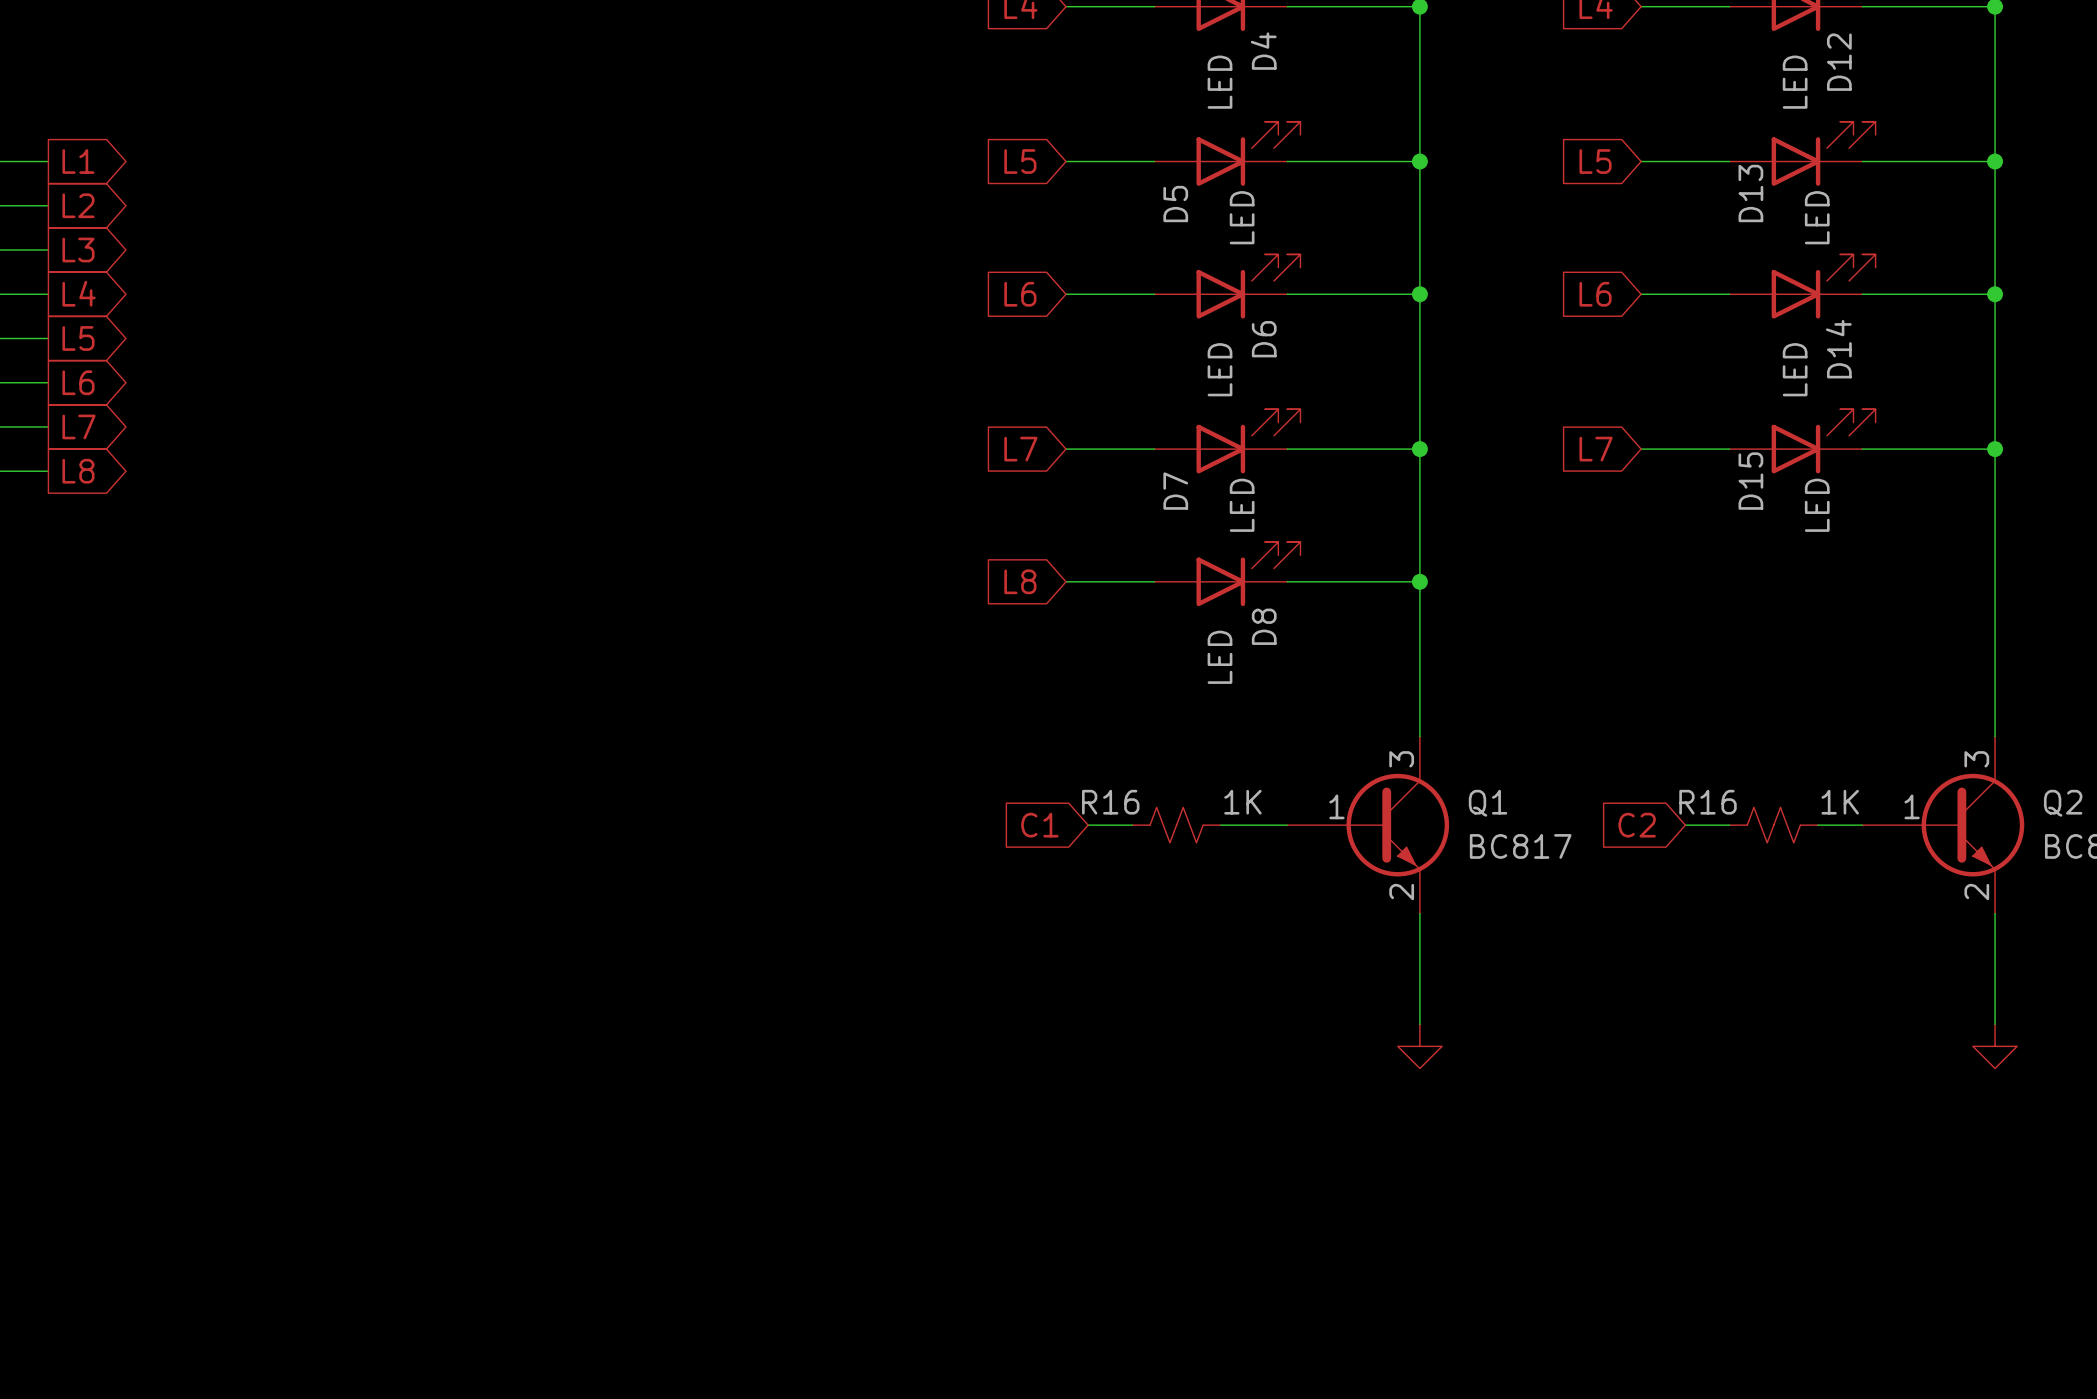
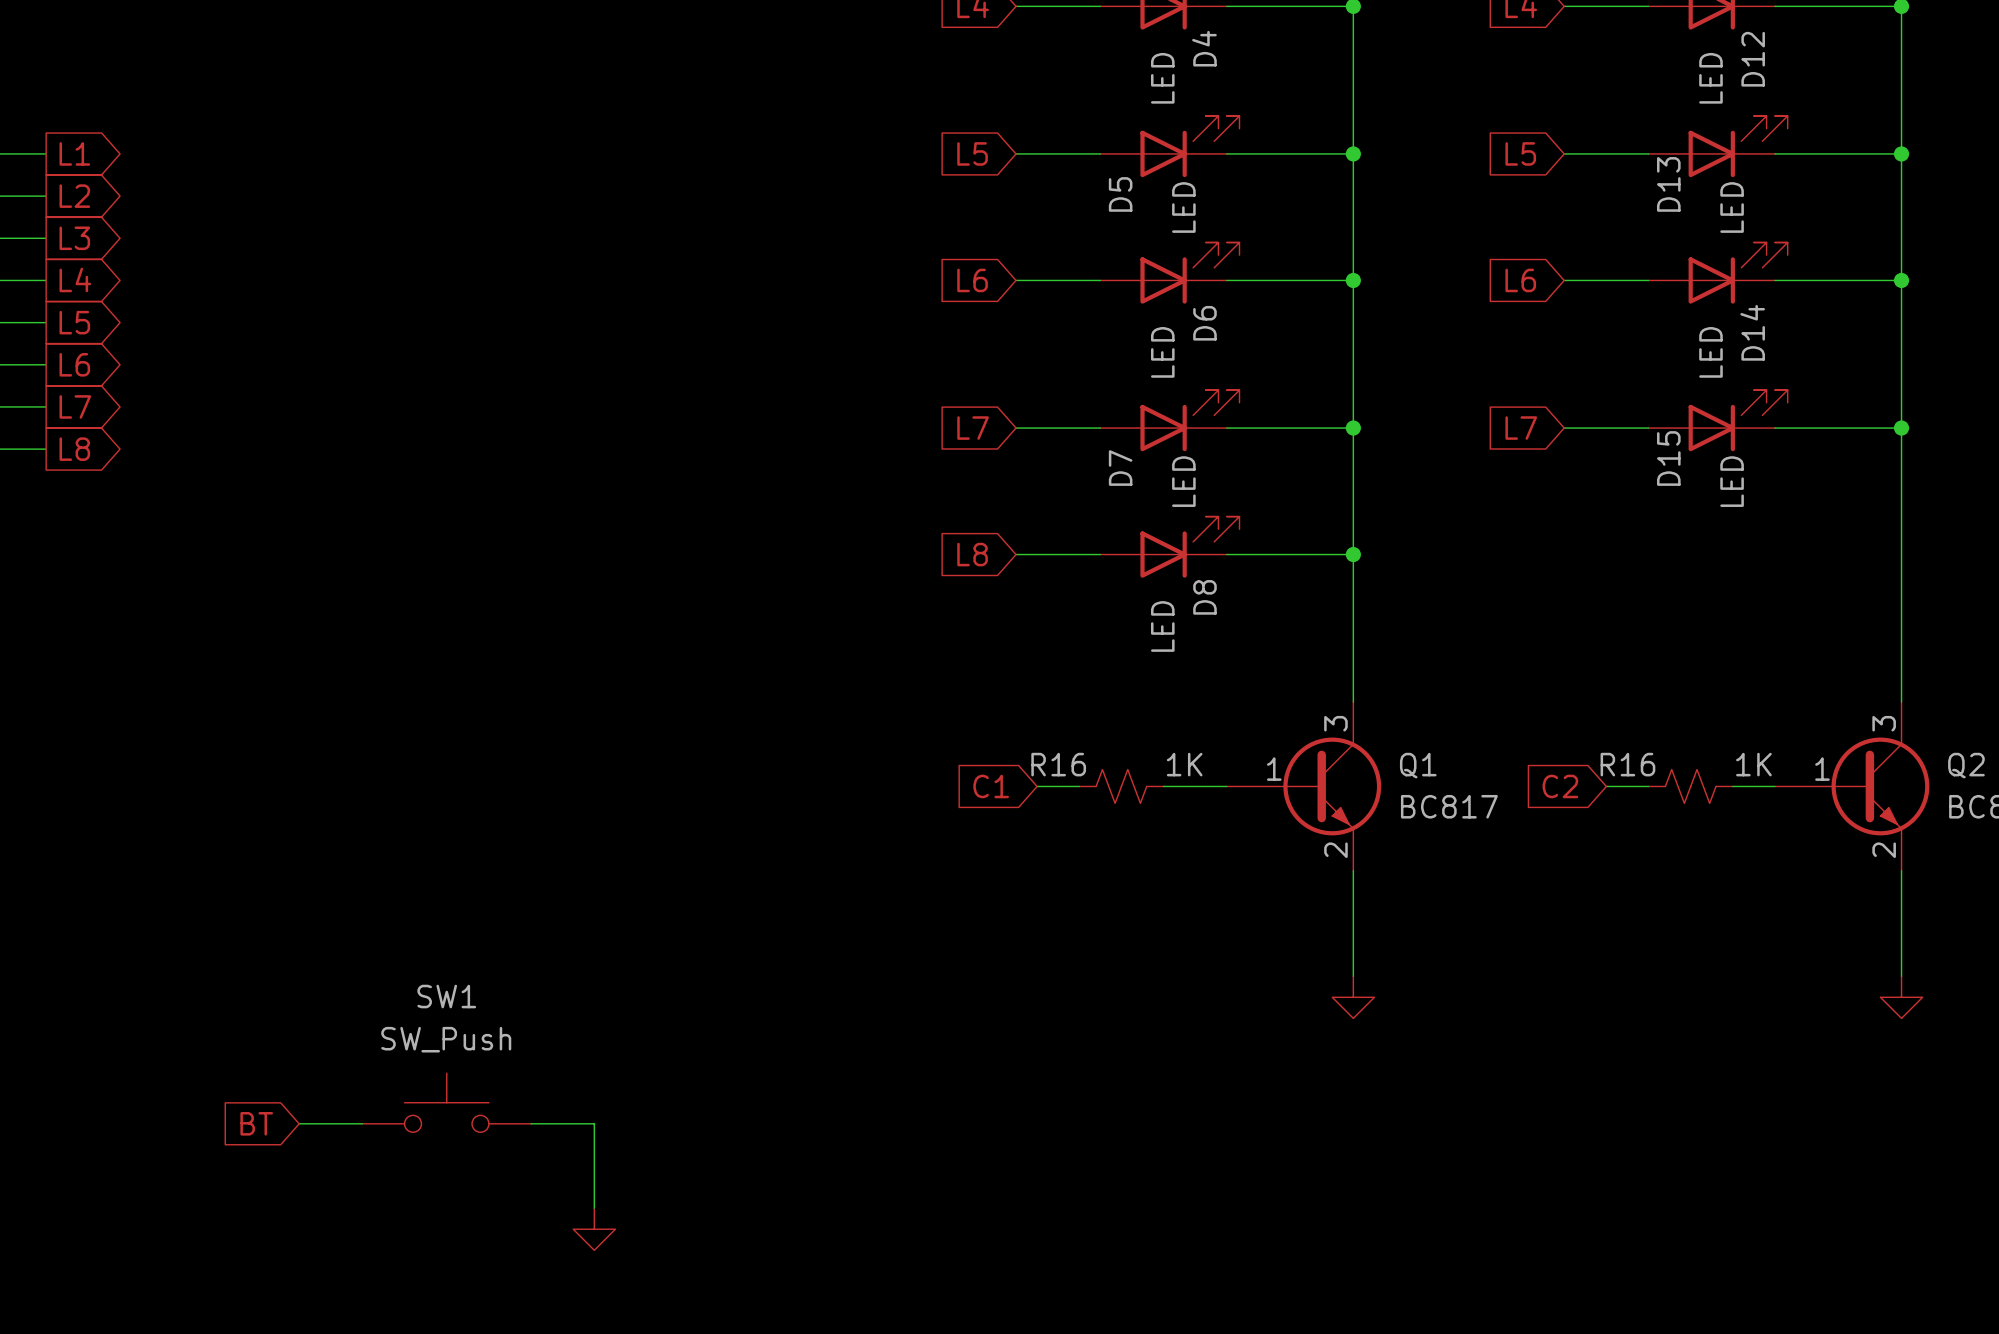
SW1: none -> SW_Push (446, 1102)
global label: none -> BT (256, 1123)
wire: none -> (299, 1123) (362, 1123)
wire: none -> (531, 1123) (594, 1123) (594, 1208)
power symbol: none -> (594, 1229)

